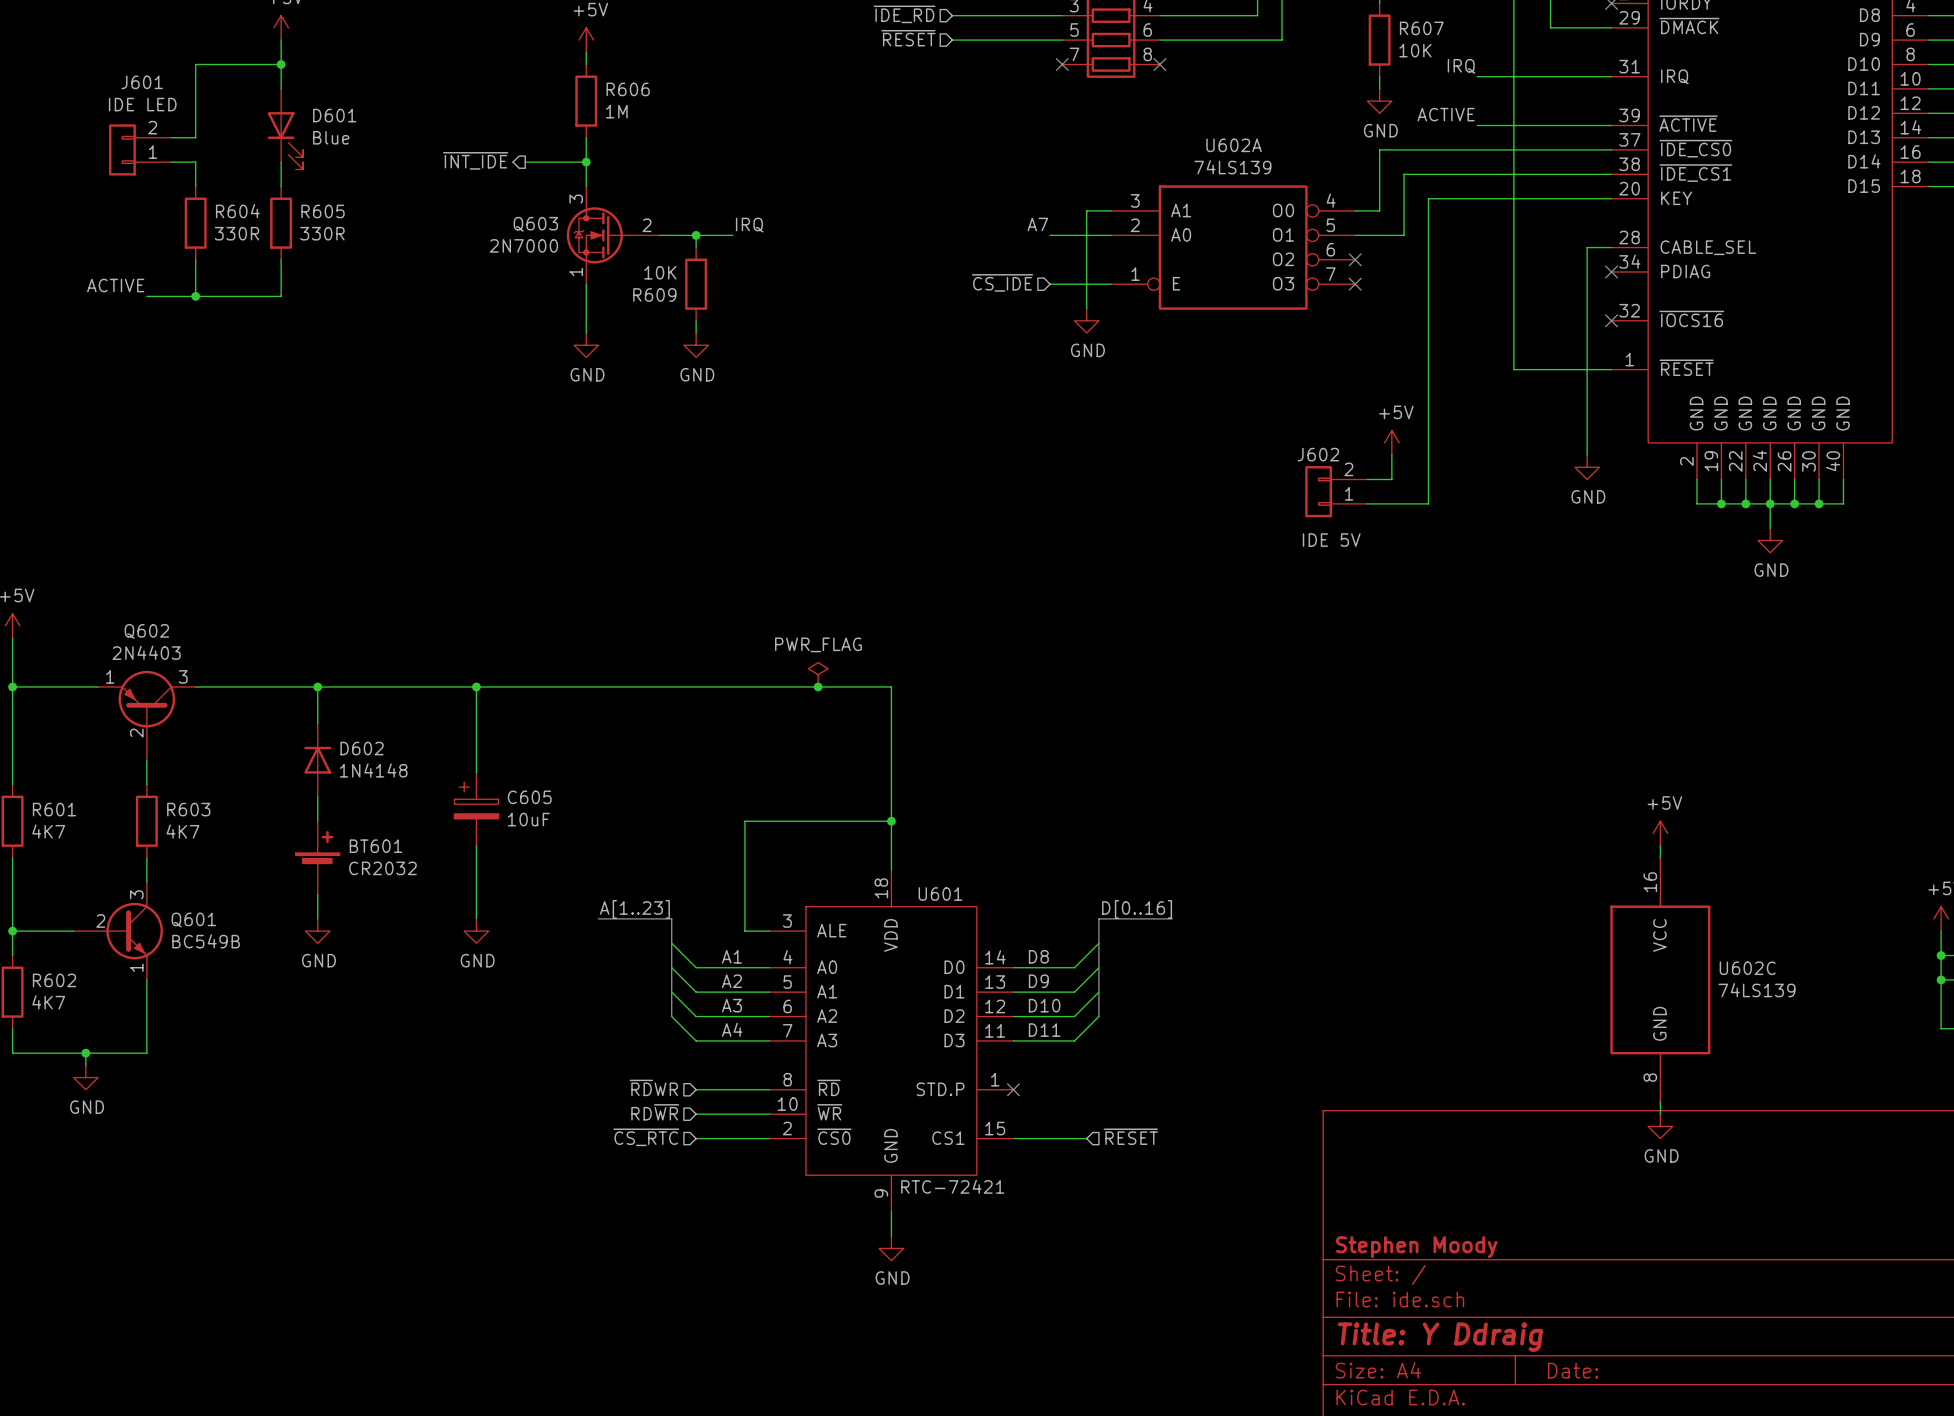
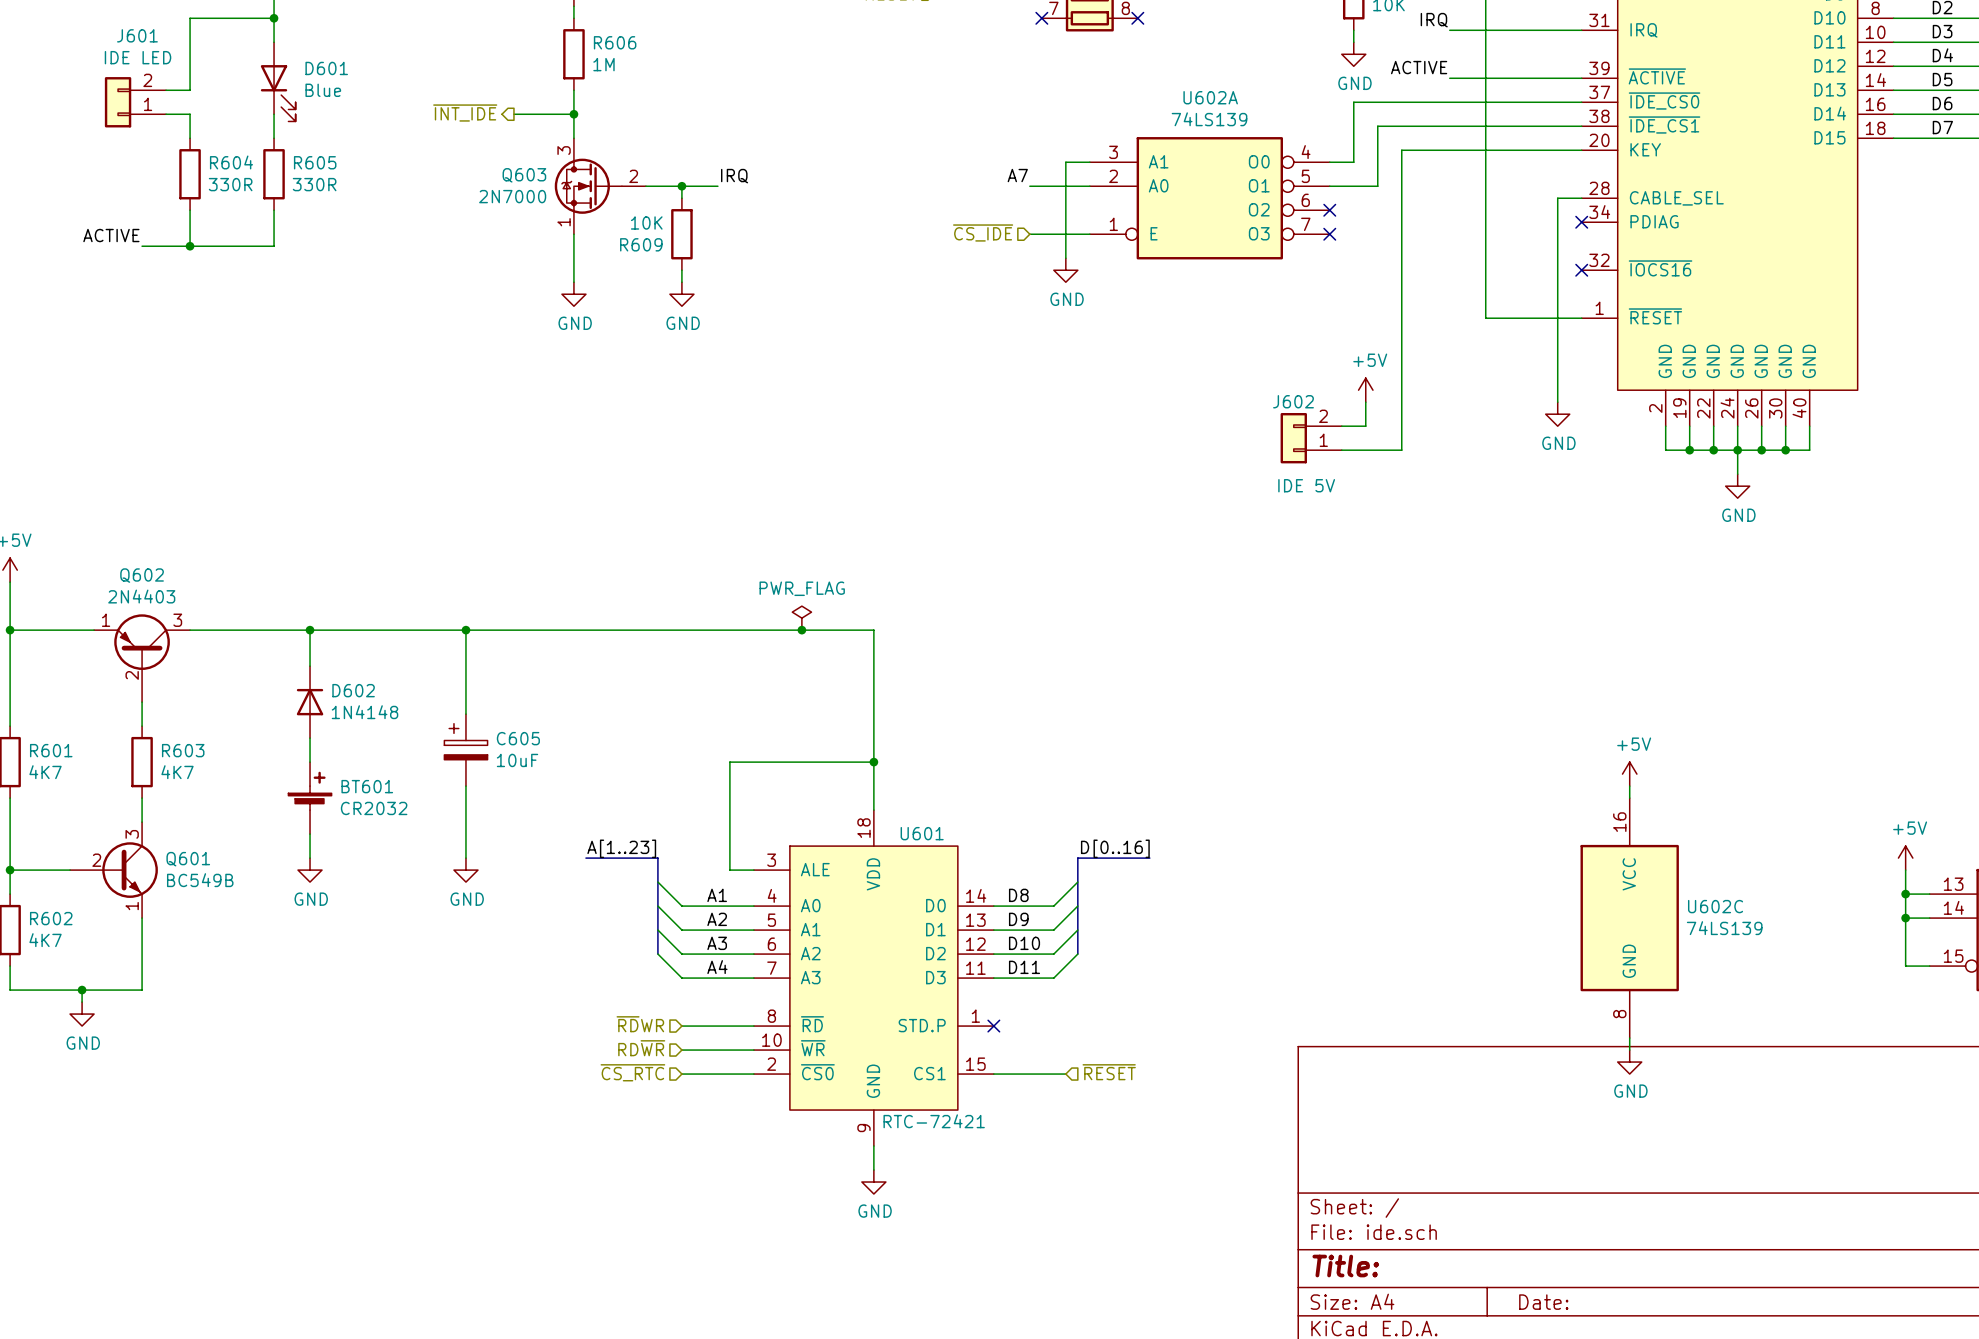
title block: Stephen Moody (1416, 1247) -> none
title block: Title: Y Ddraig (1440, 1337) -> Title: (1345, 1266)

